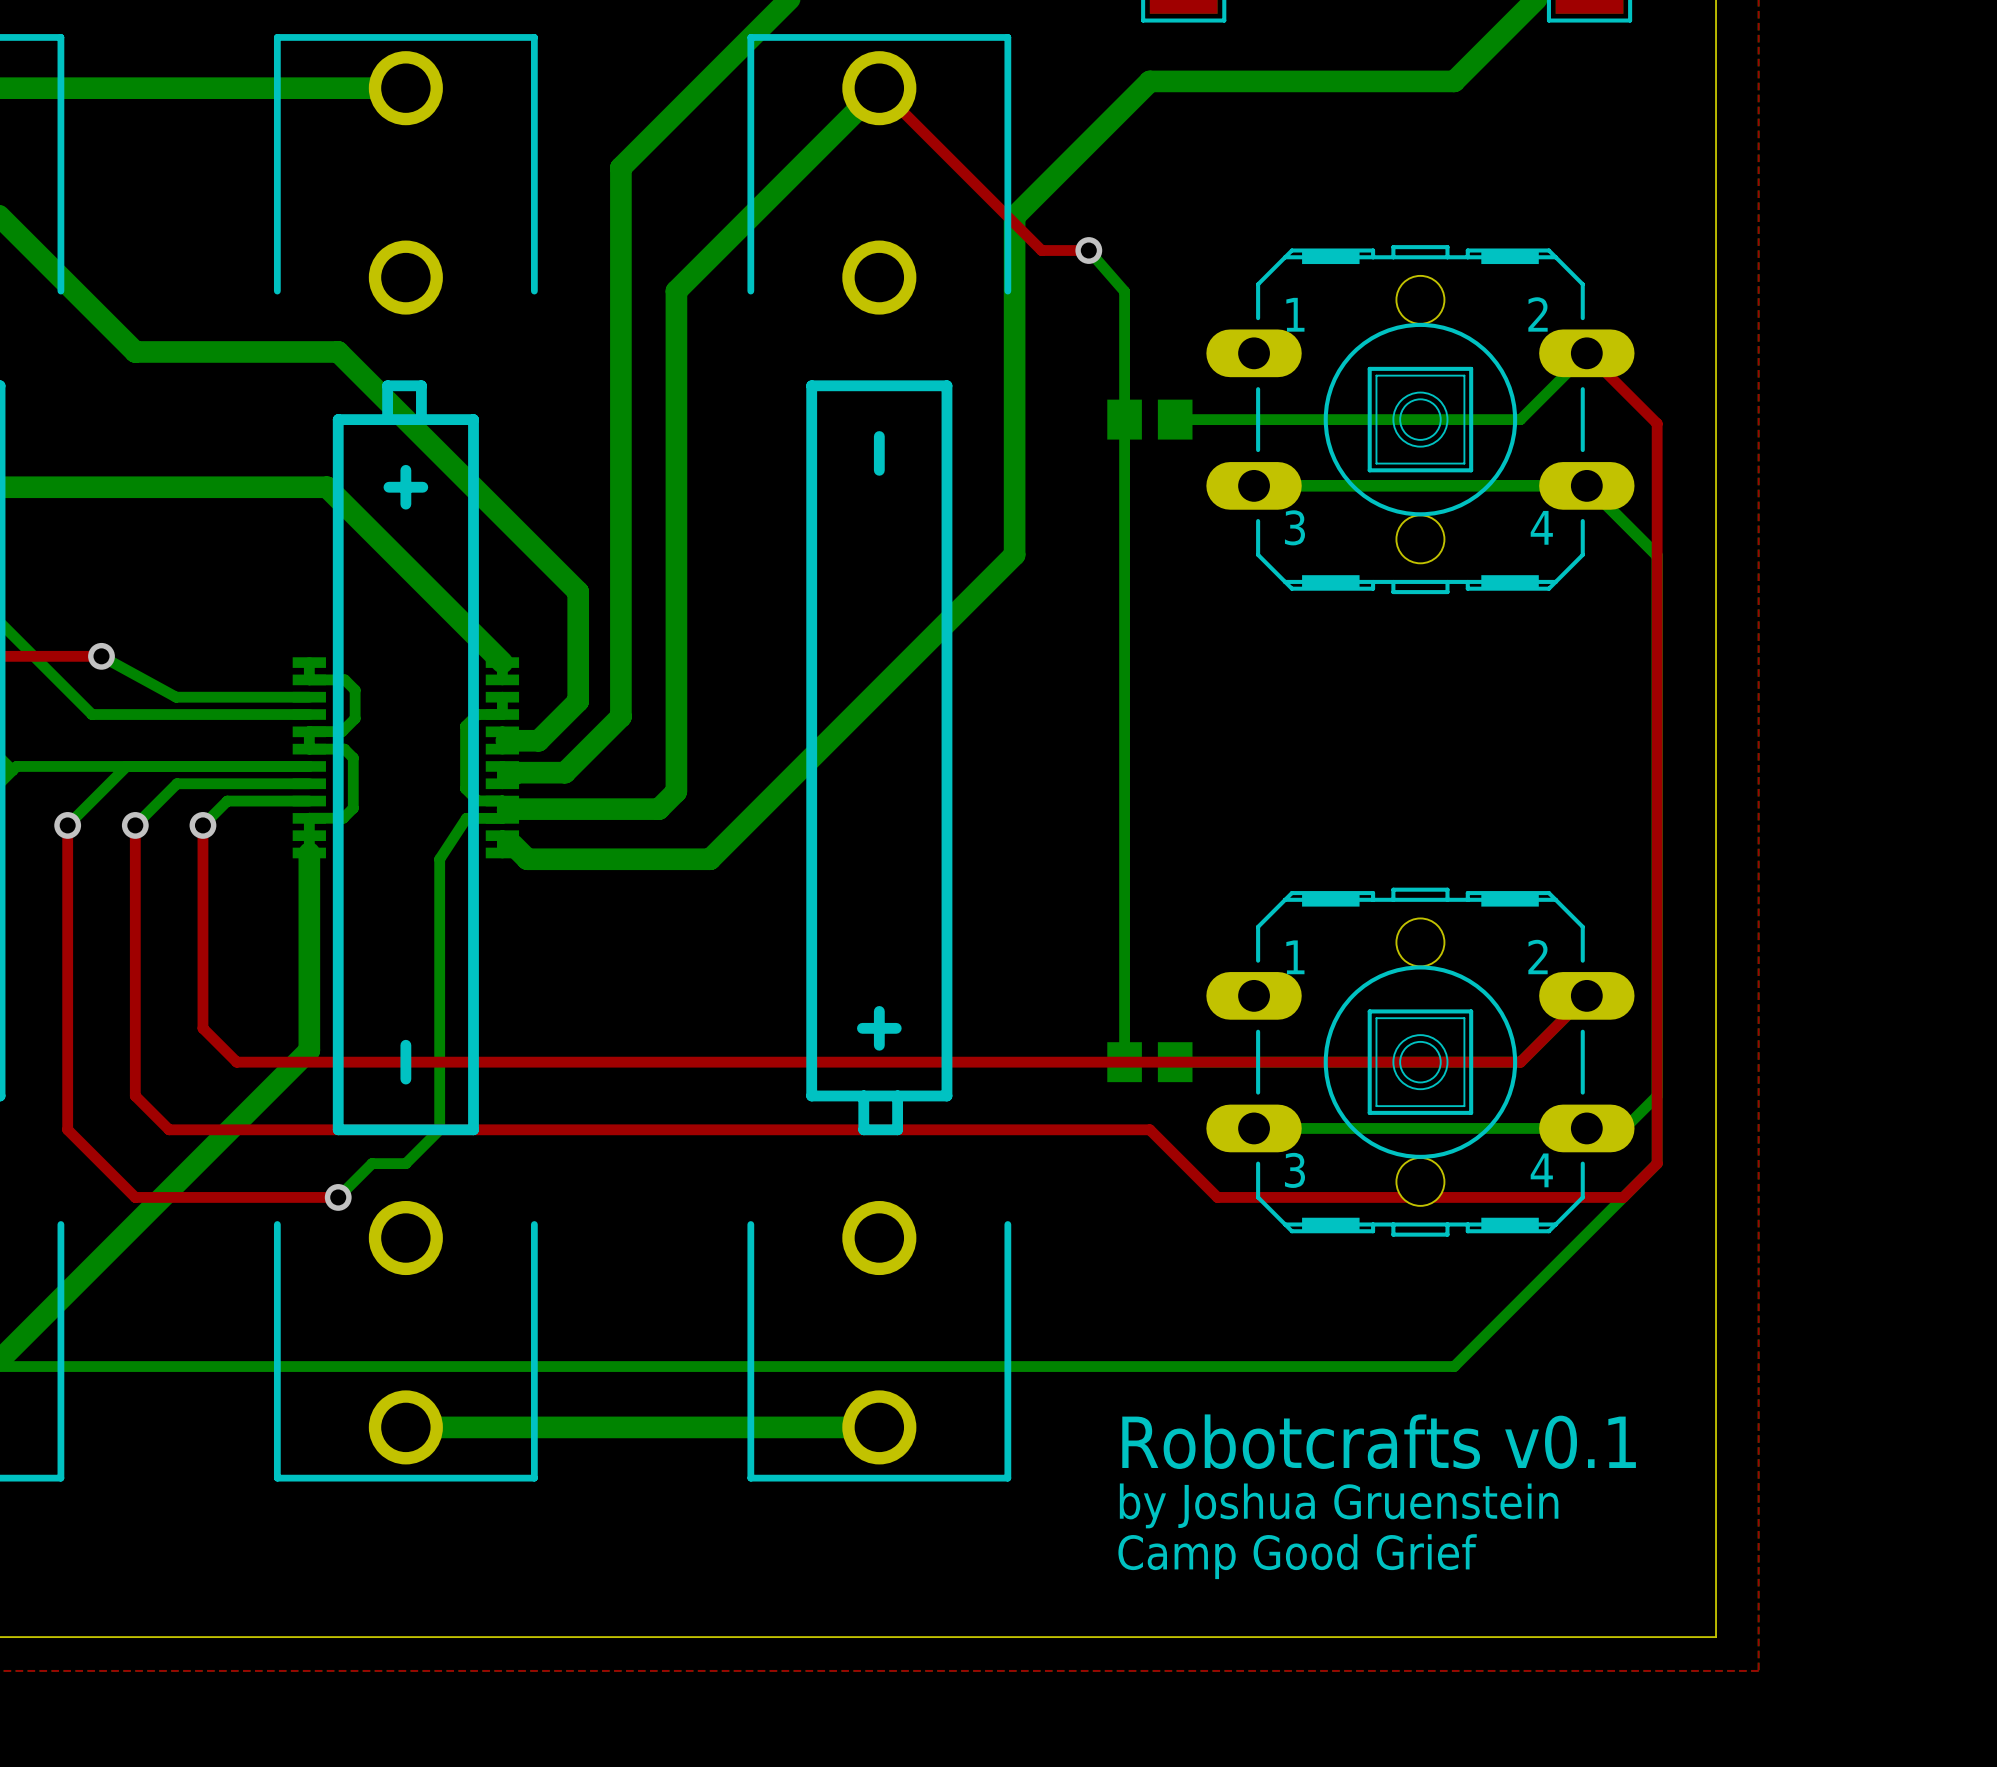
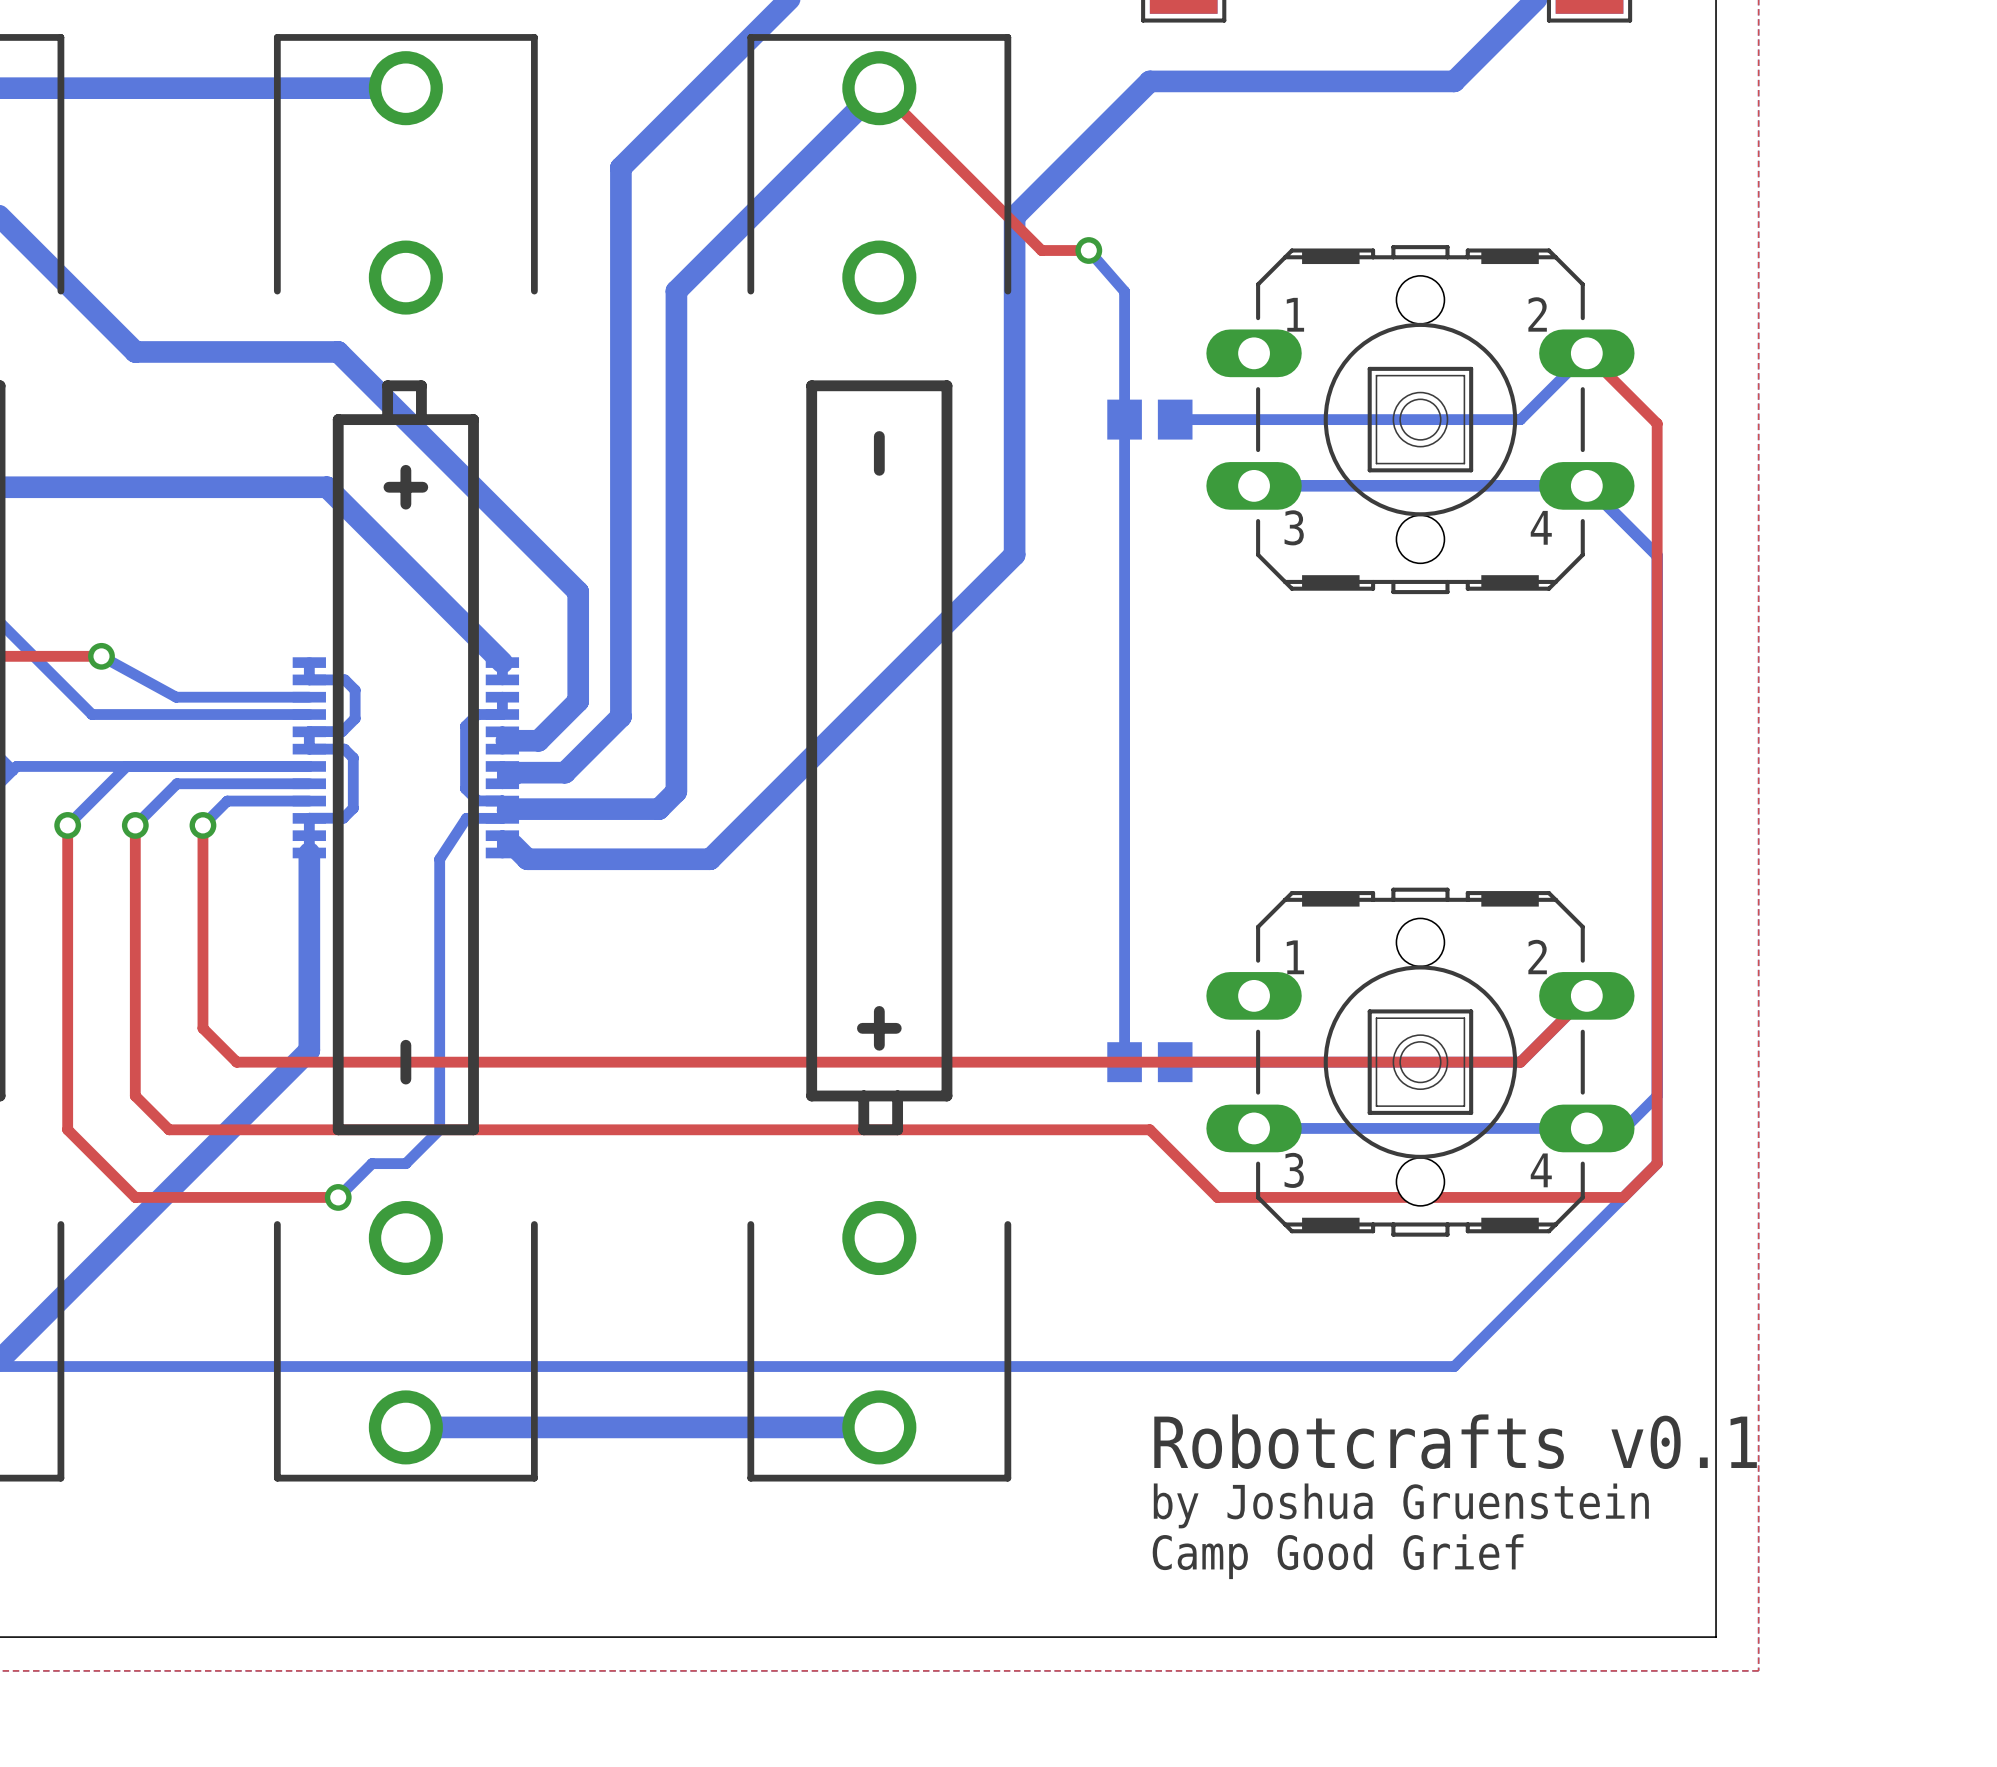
text position: Robotcrafts v0.1 (1379, 1441) -> Robotcrafts v0.1 (1455, 1441)
text position: by Joshua Gruenstein (1339, 1505) -> by Joshua Gruenstein (1401, 1505)
text position: Camp Good Grief (1297, 1556) -> Camp Good Grief (1338, 1556)

